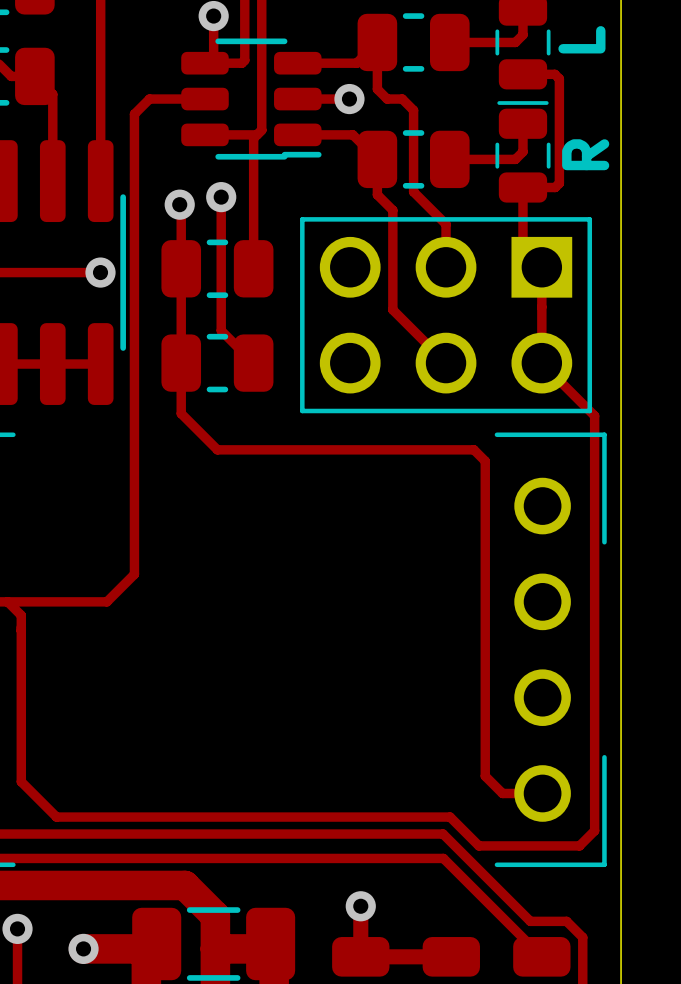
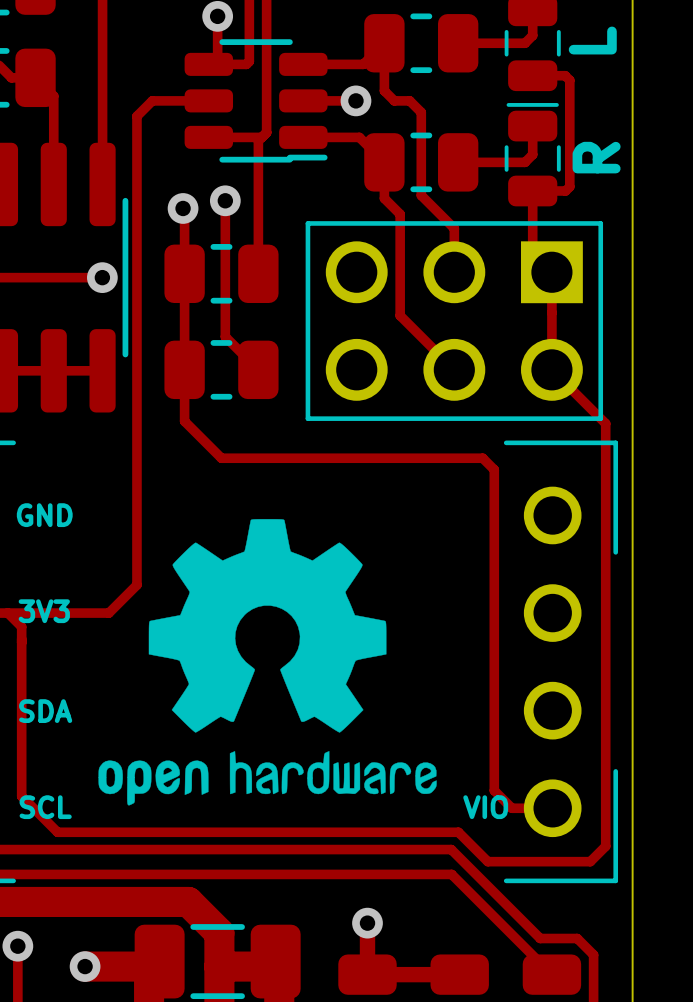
text: none -> GND (44, 515)
drawing: none -> [98, 519, 437, 806]
text: none -> 3V3 (44, 611)
text: none -> SDA (45, 711)
text: none -> SCL (45, 807)
text: none -> VIO (485, 807)

